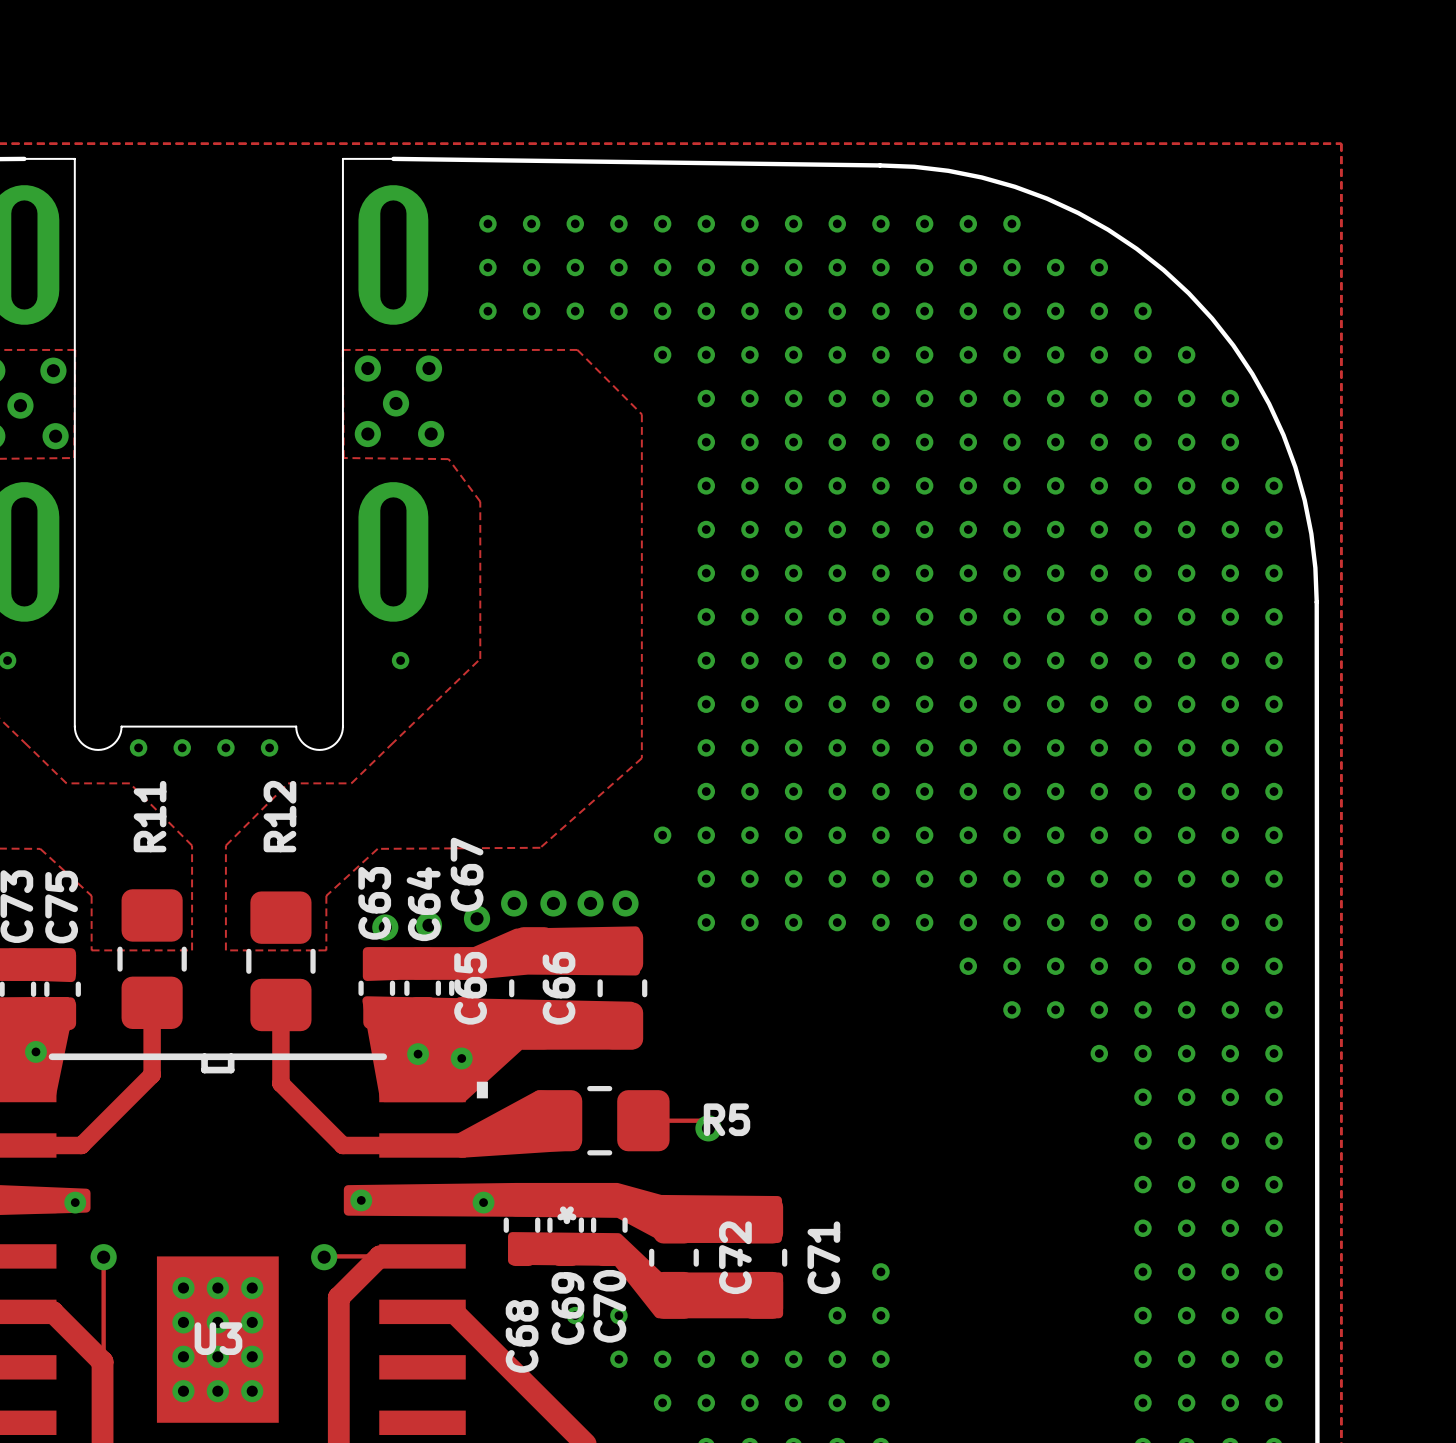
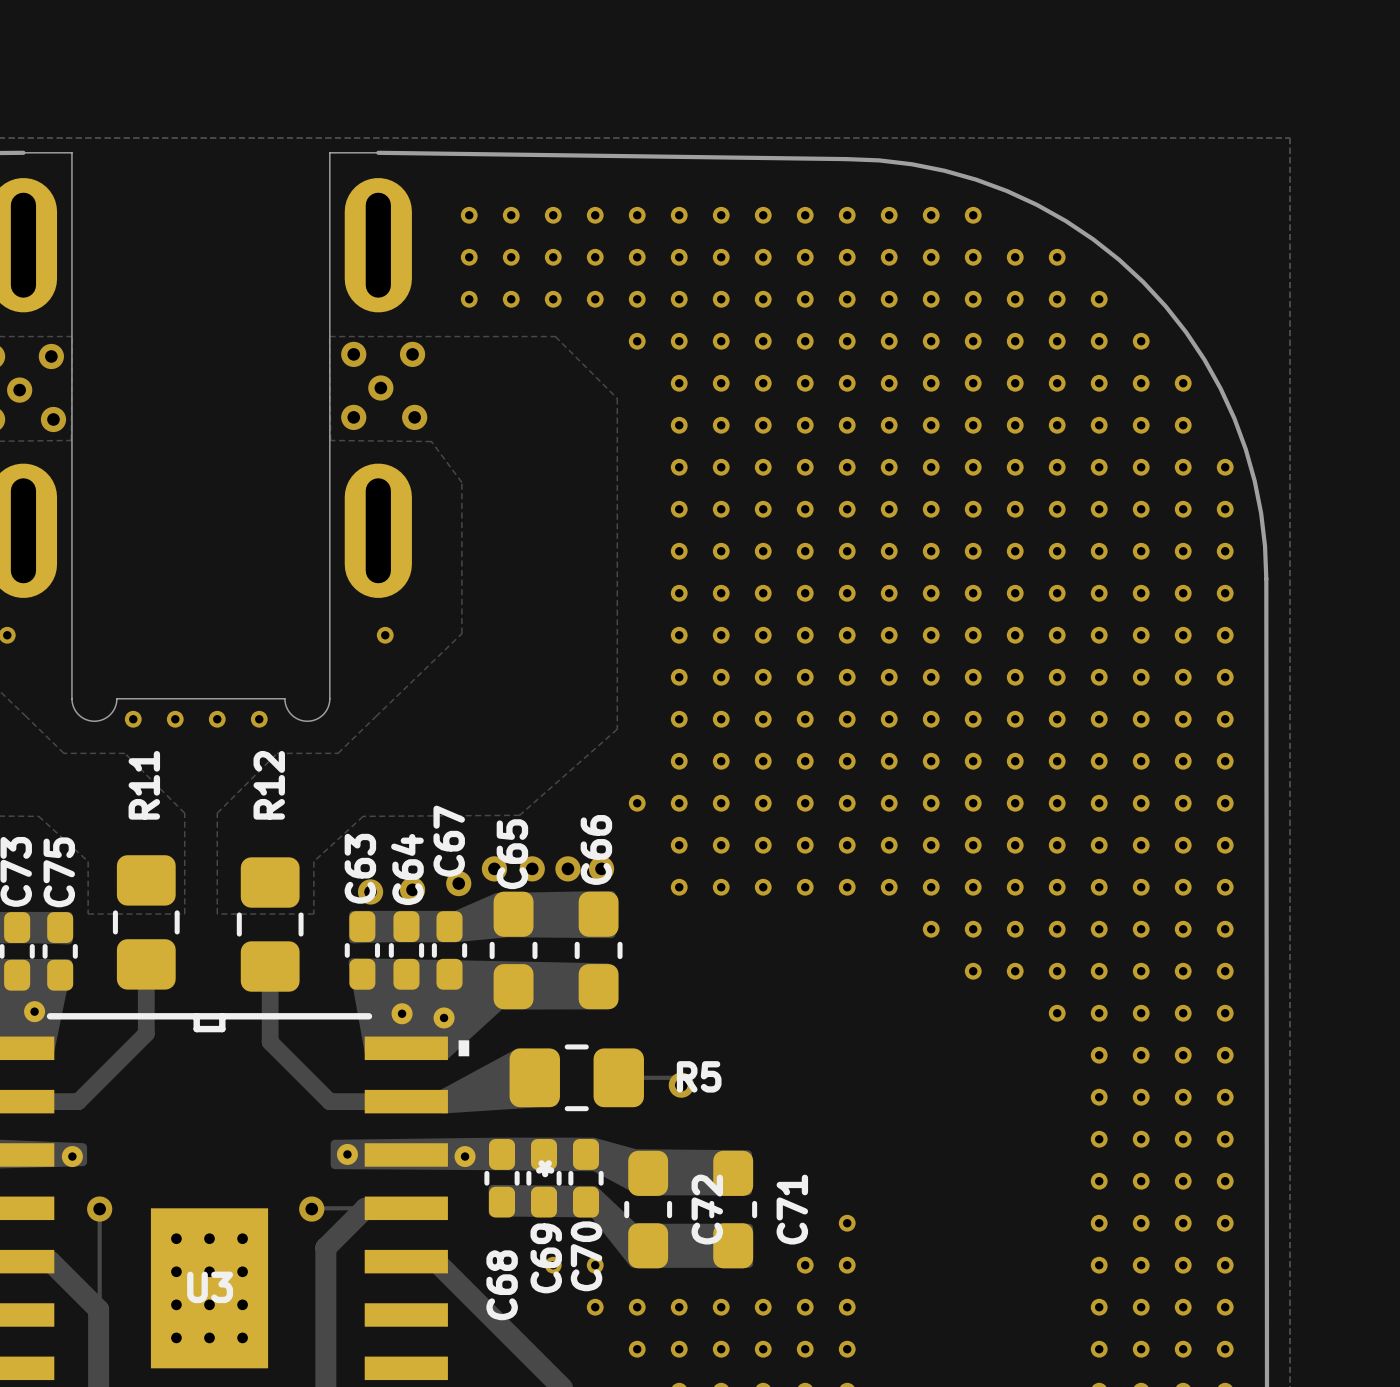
C65 name position: C65 (470, 988) -> C65 (512, 854)
C66 name position: C66 (559, 988) -> C66 (596, 849)

